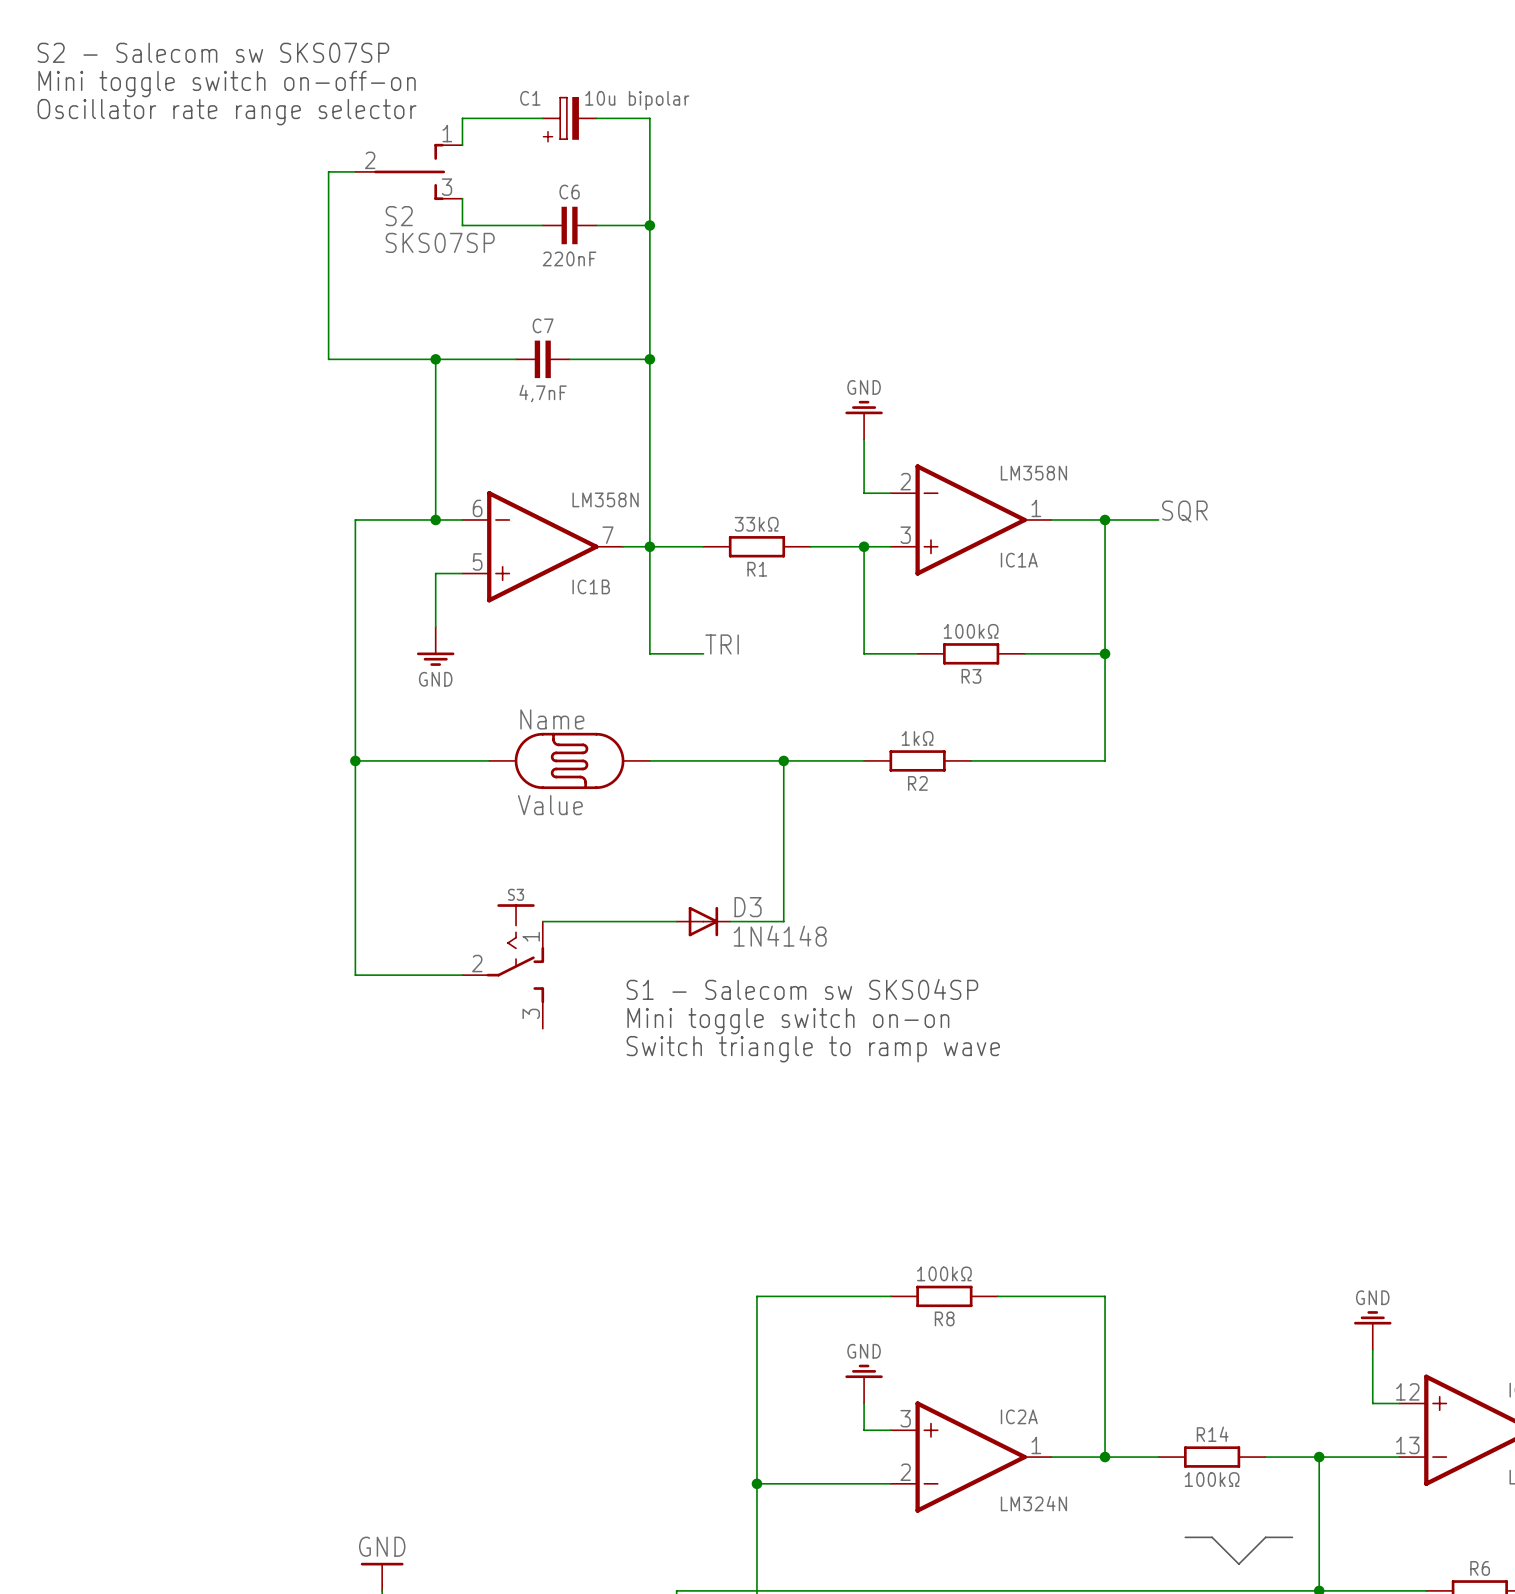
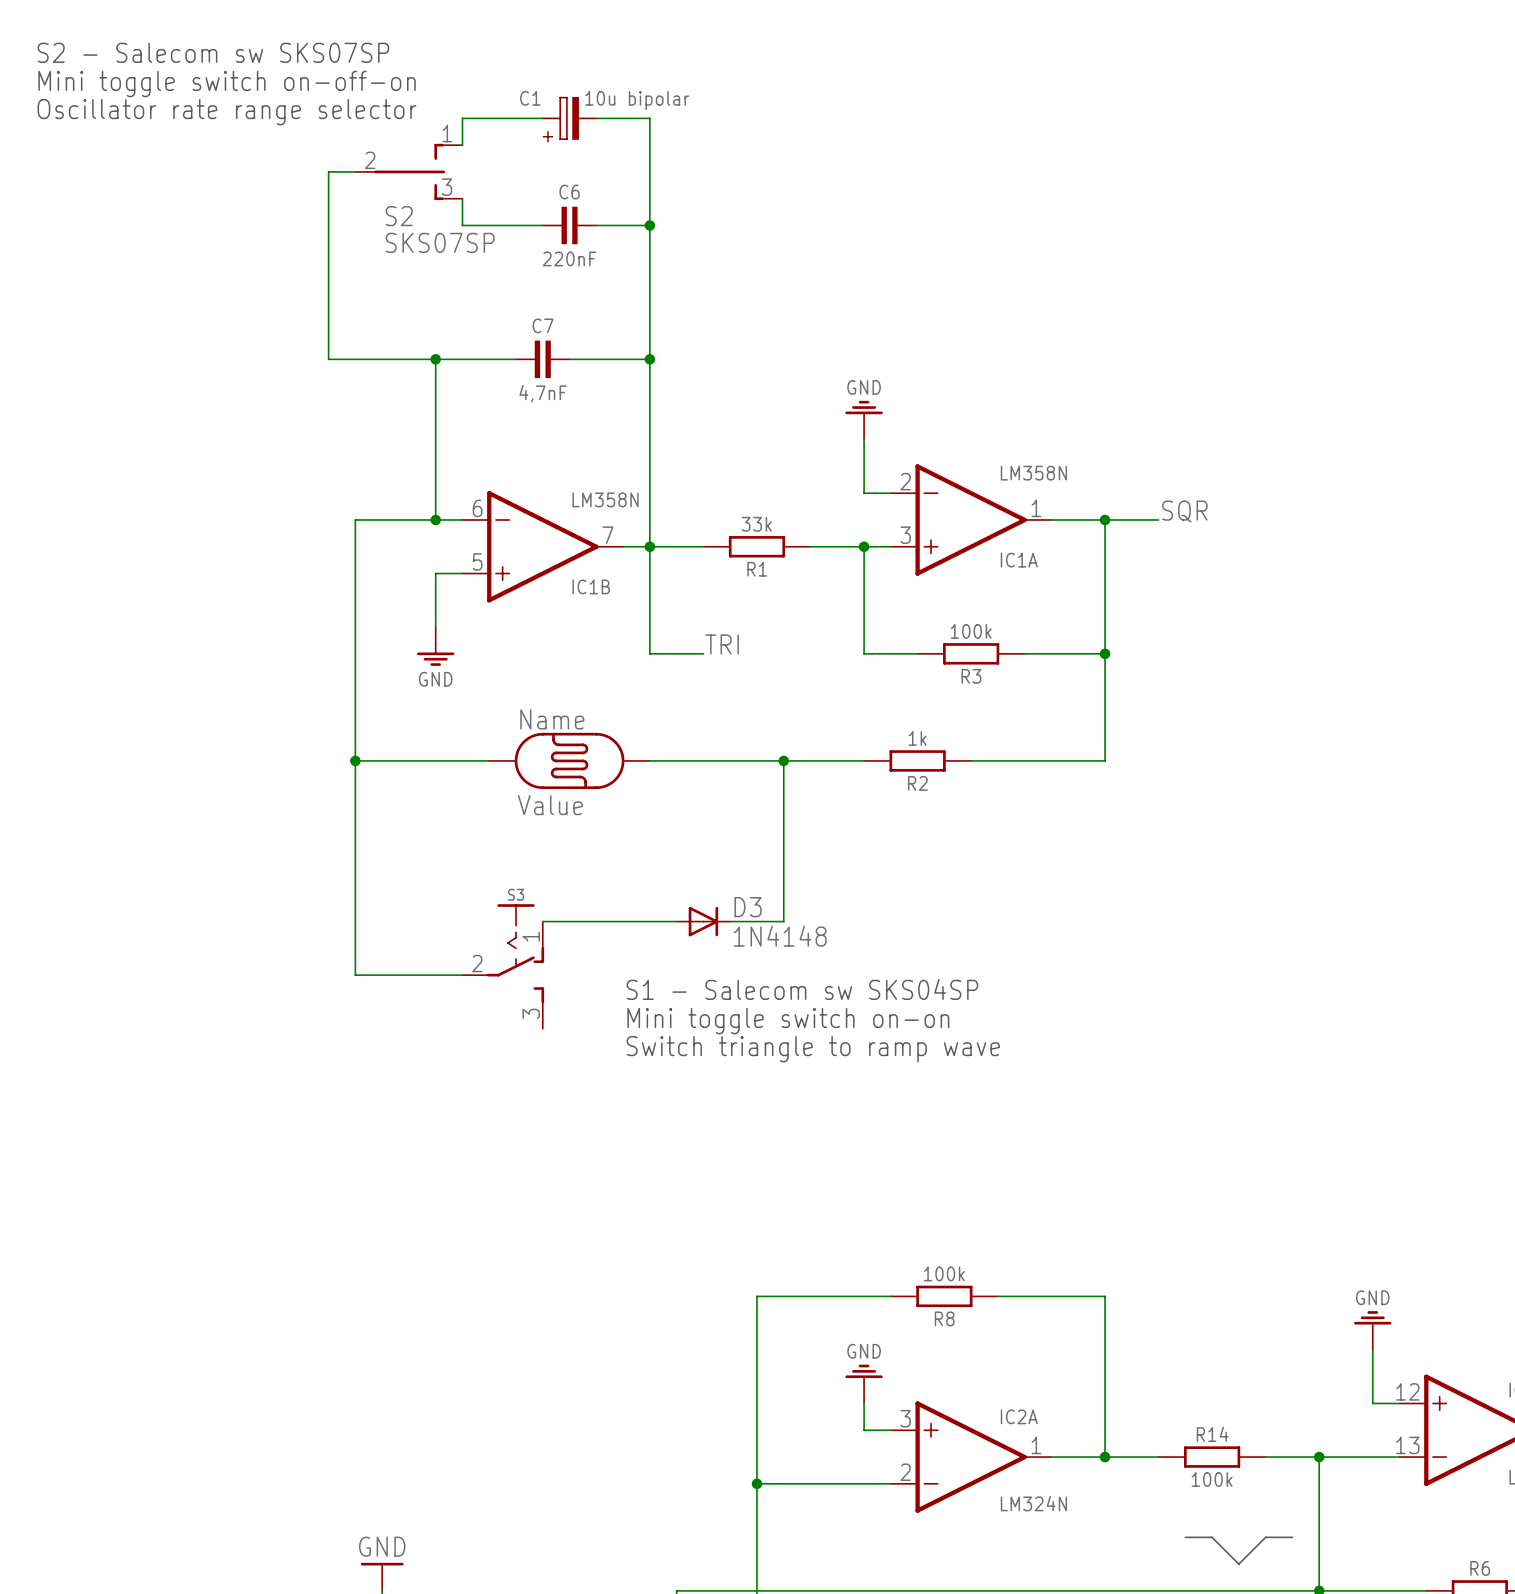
R1 value: 33kΩ (756, 524) -> 33k (756, 524)
R3 value: 100kΩ (971, 631) -> 100k (971, 631)
R2 value: 1kΩ (917, 738) -> 1k (917, 738)
R8 value: 100kΩ (944, 1273) -> 100k (944, 1273)
R14 value: 100kΩ (1212, 1479) -> 100k (1212, 1479)

